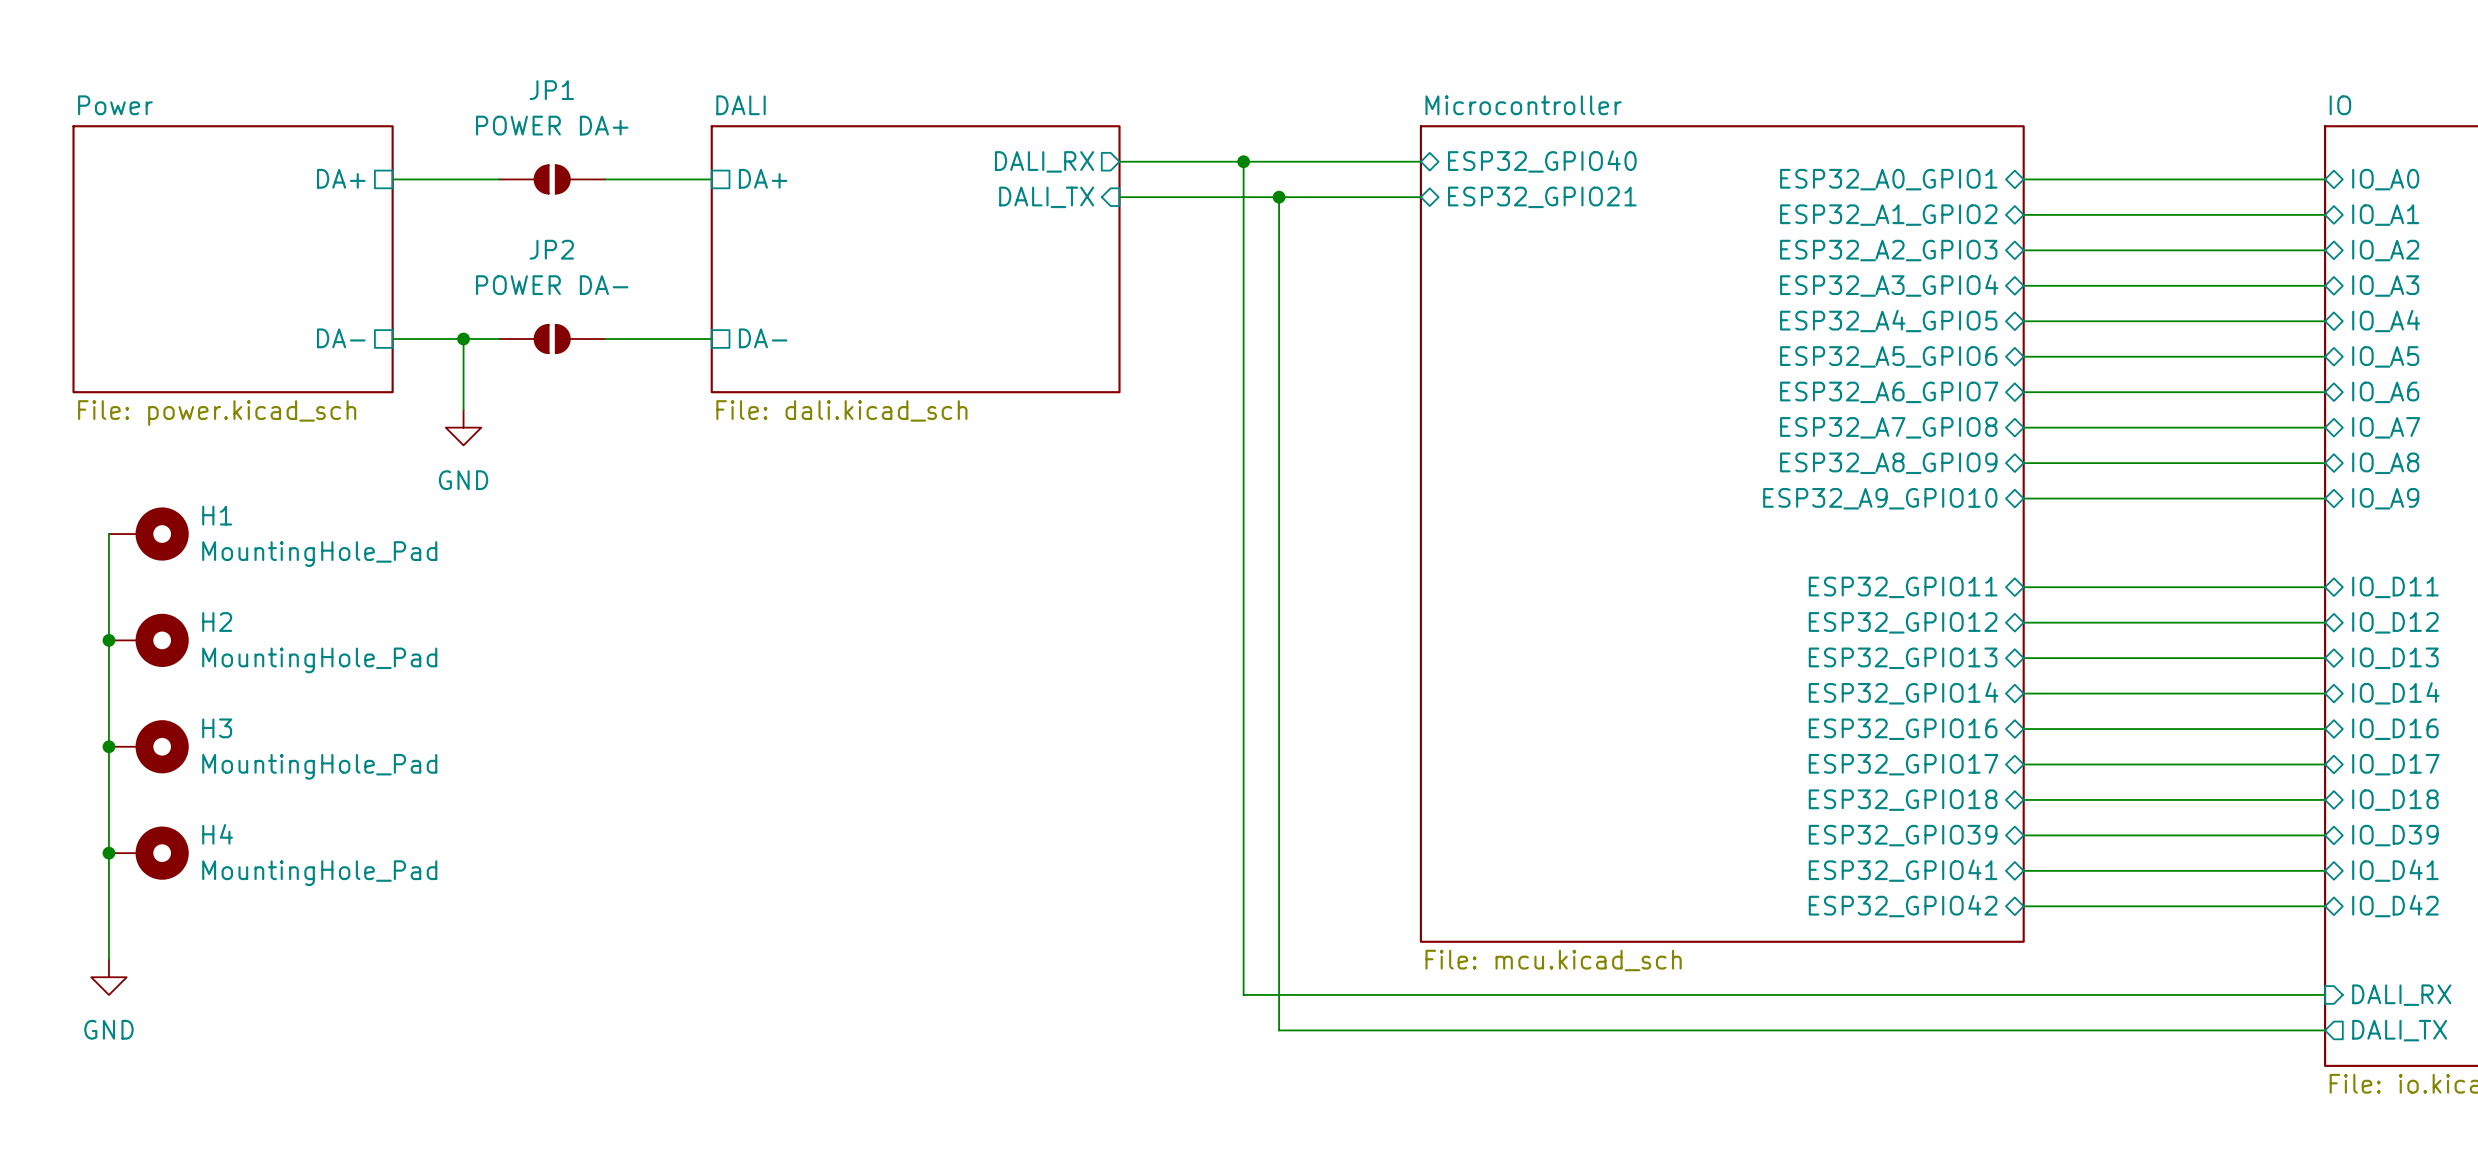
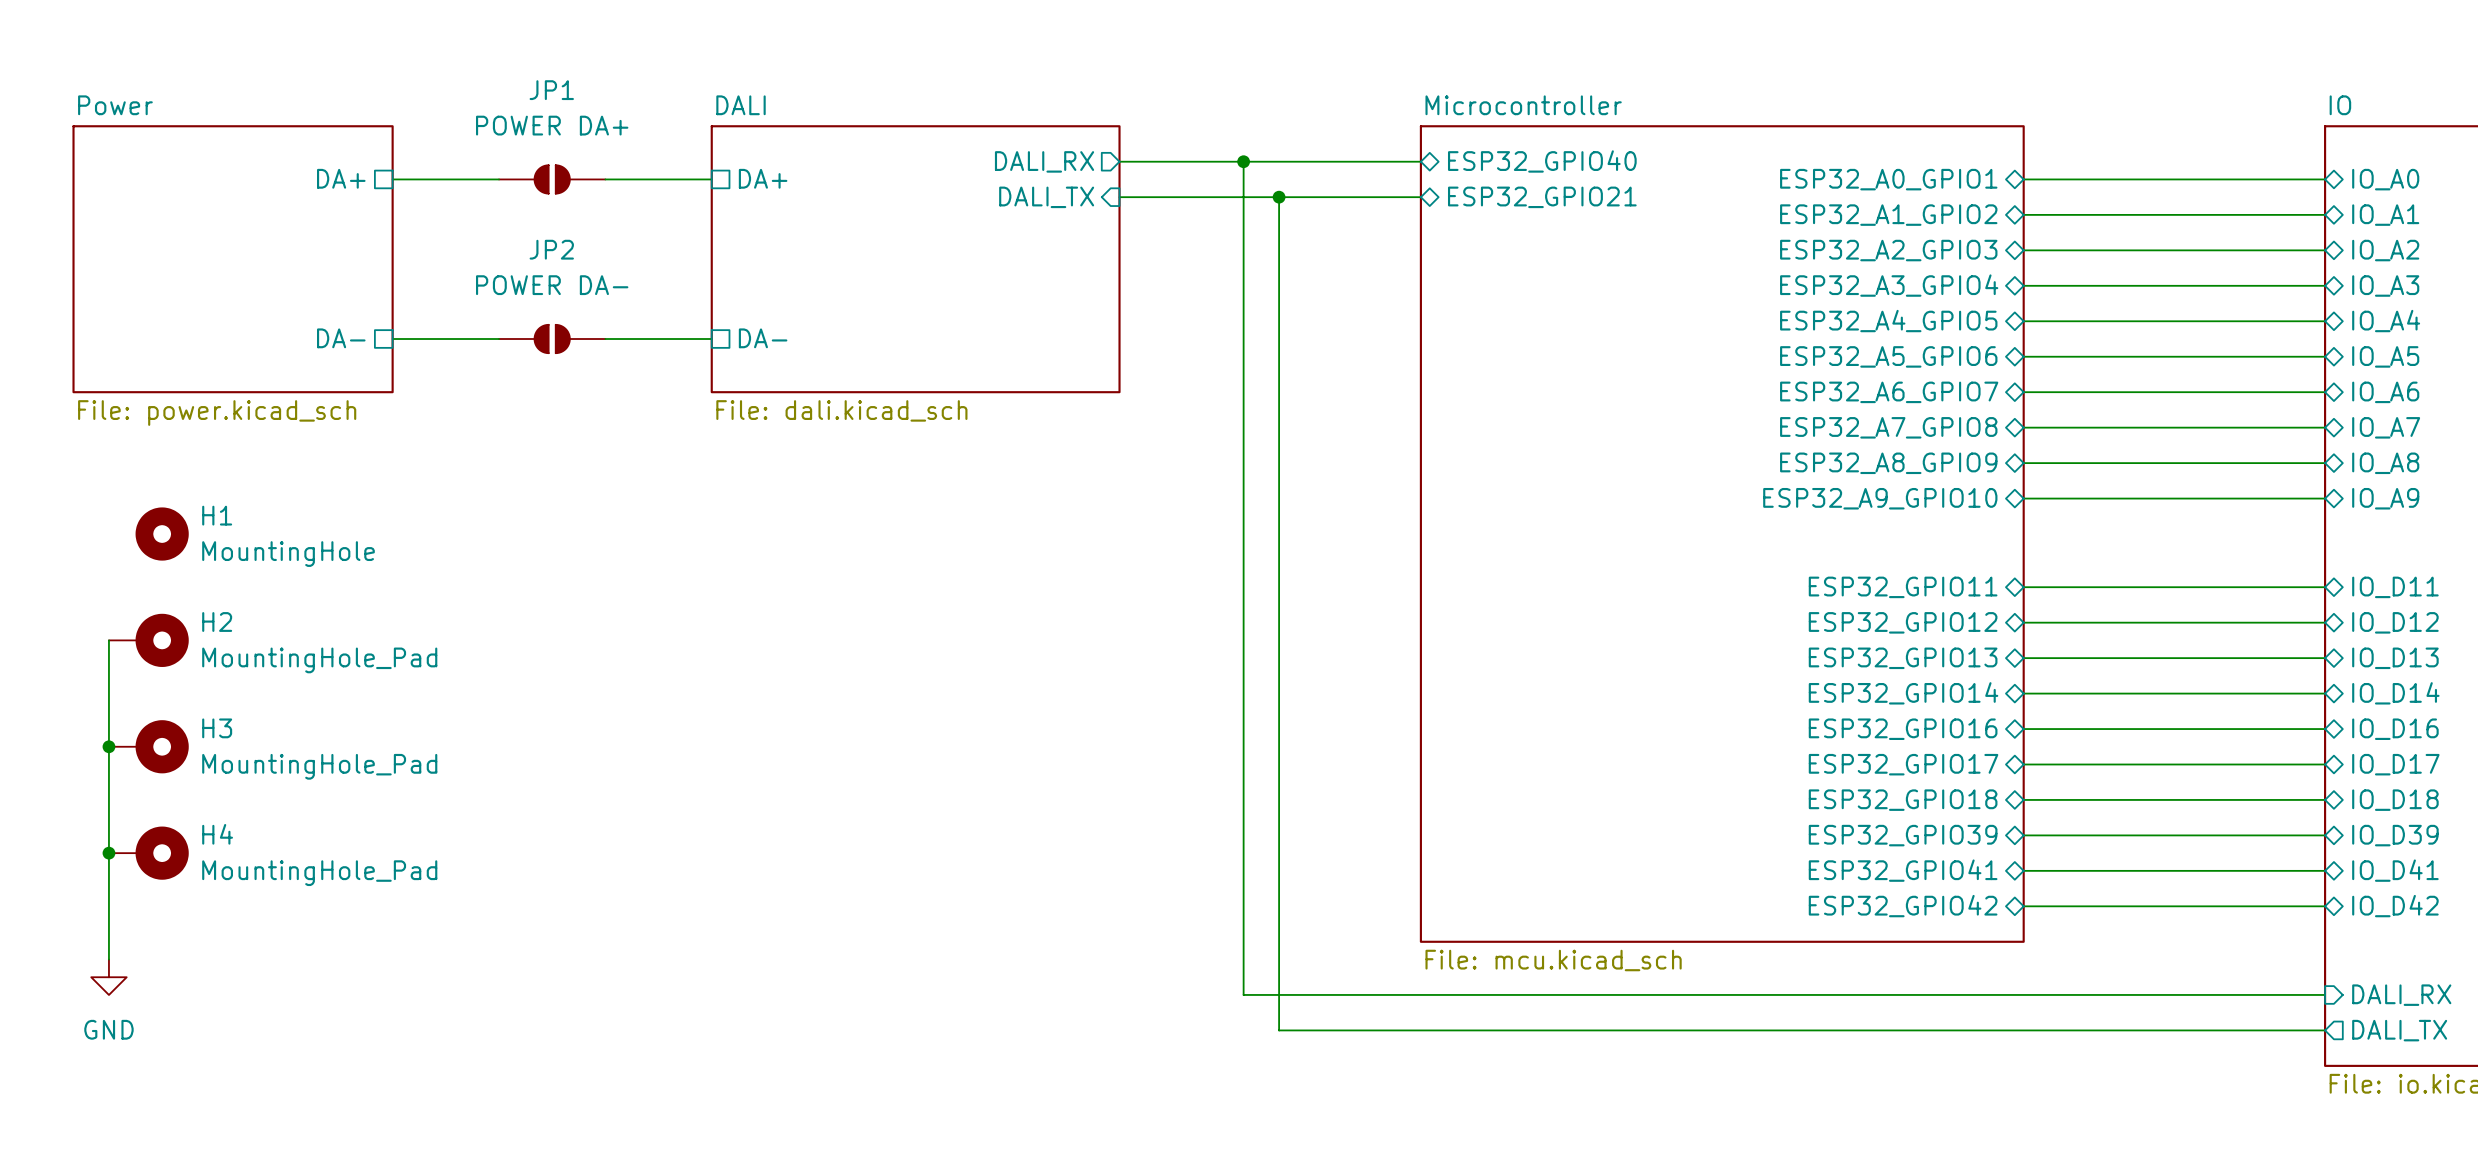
wire: (463, 339) (463, 409) -> none
junction: (463, 339) -> none
power symbol: GND (463, 427) -> none
H1 symbol: [108, 507, 189, 561] -> [135, 507, 189, 561]
wire: (108, 534) (108, 640) -> none
H1 value: MountingHole_Pad (319, 554) -> MountingHole (288, 554)
junction: (108, 640) -> none

